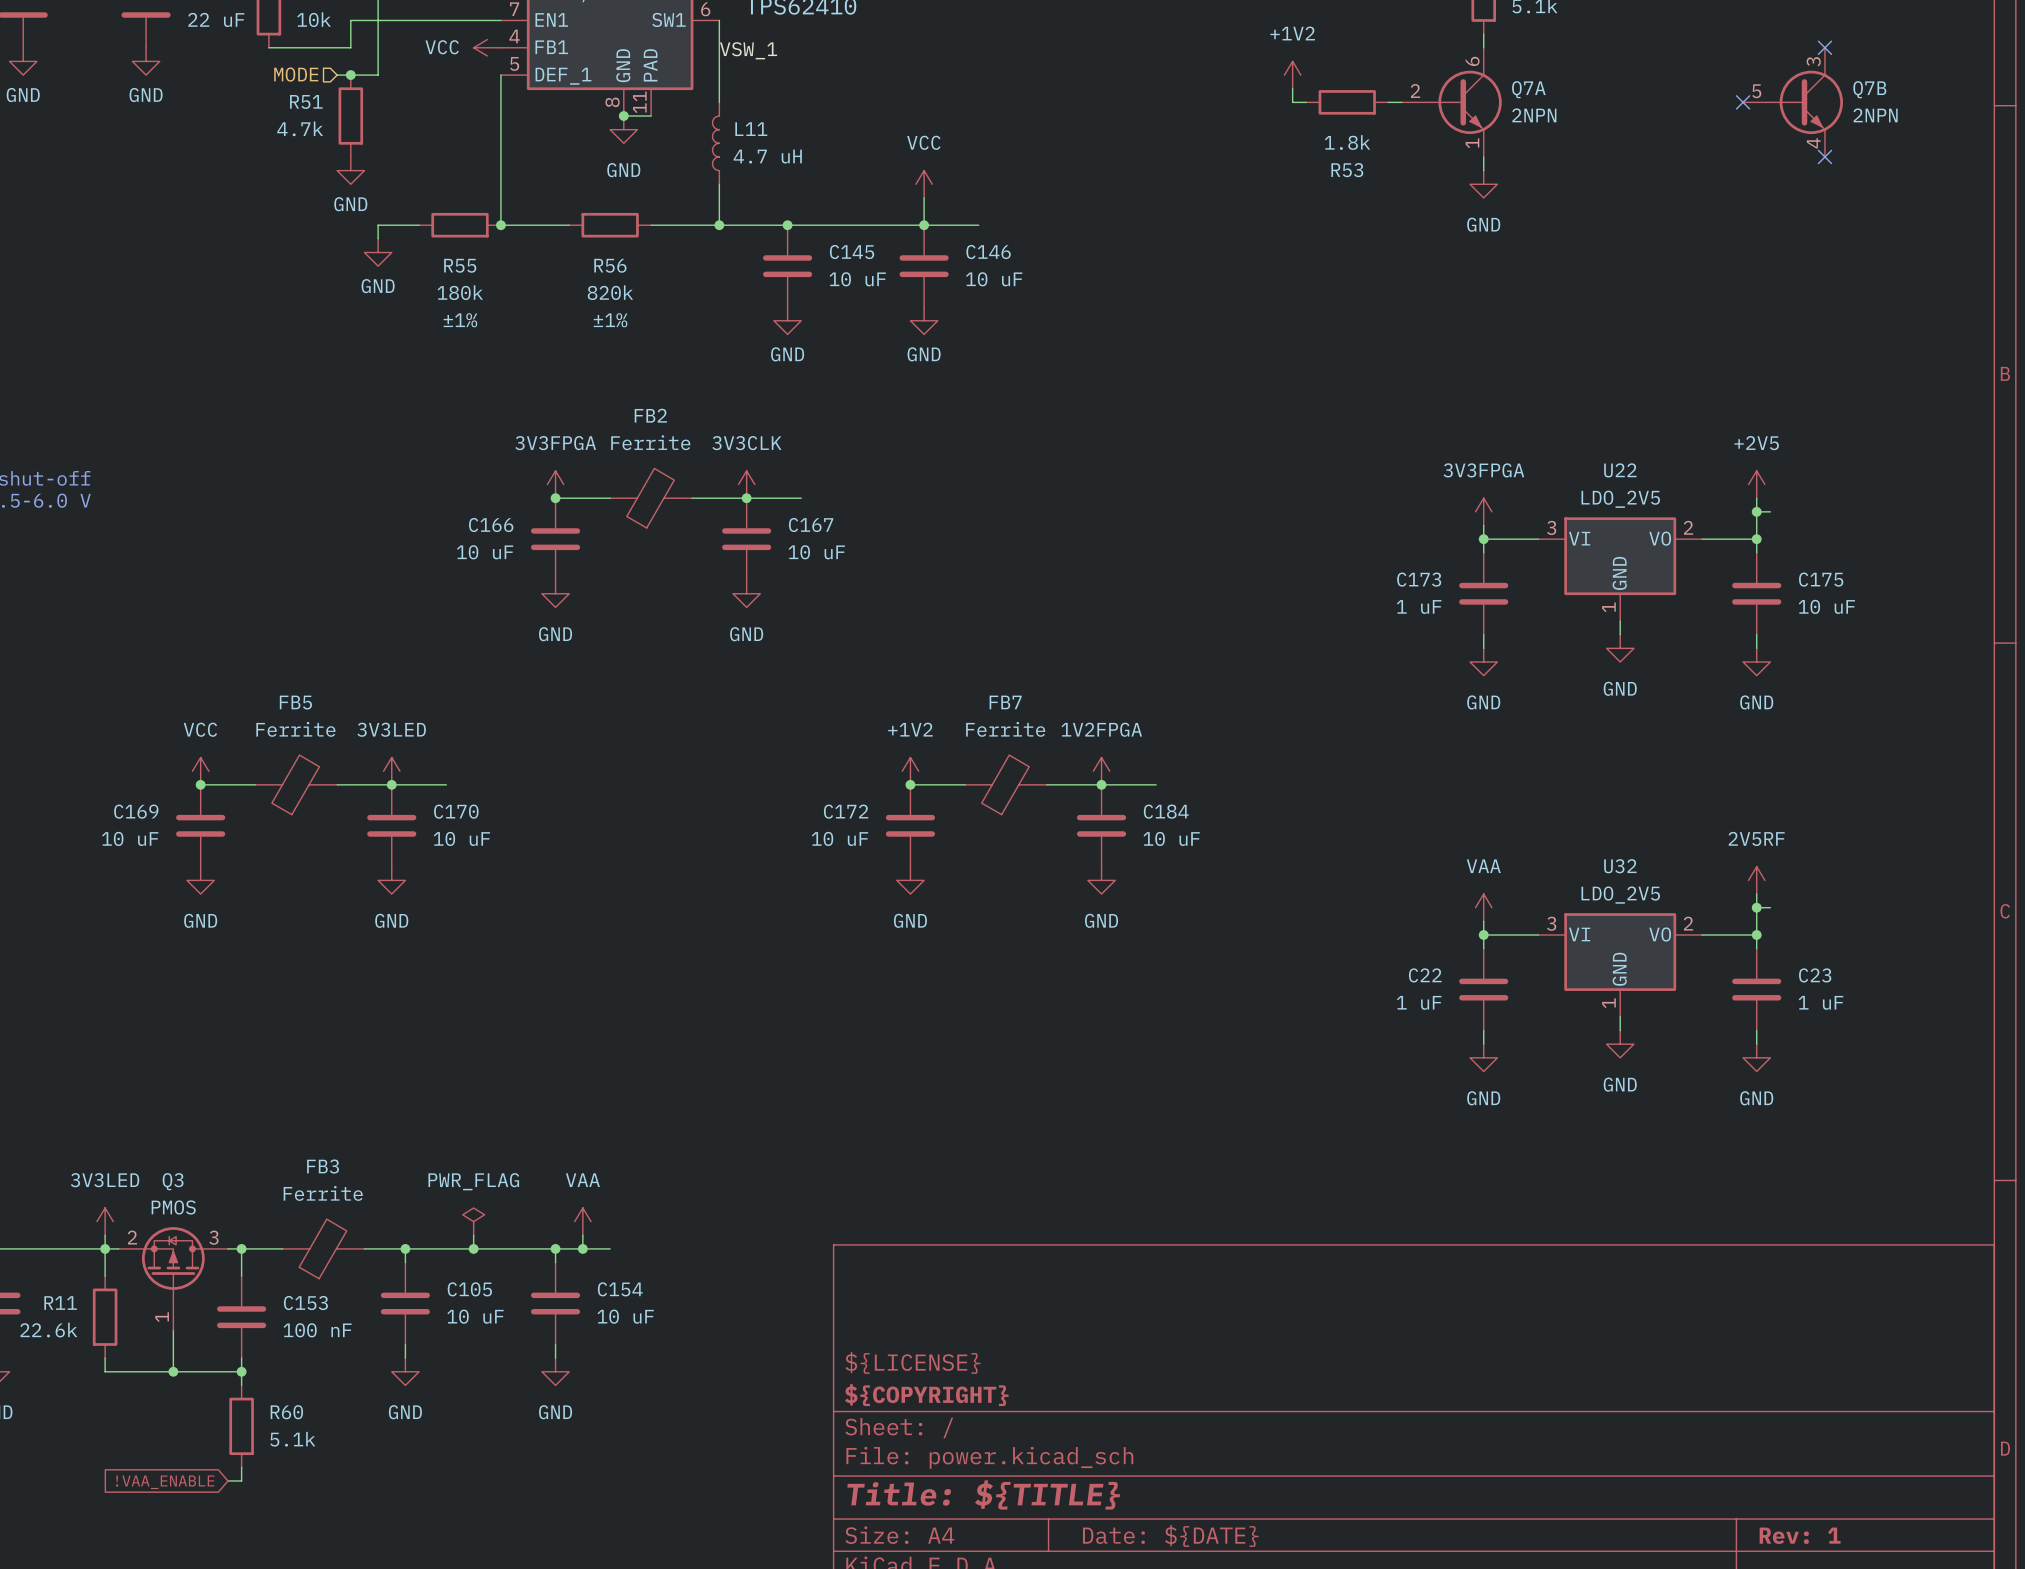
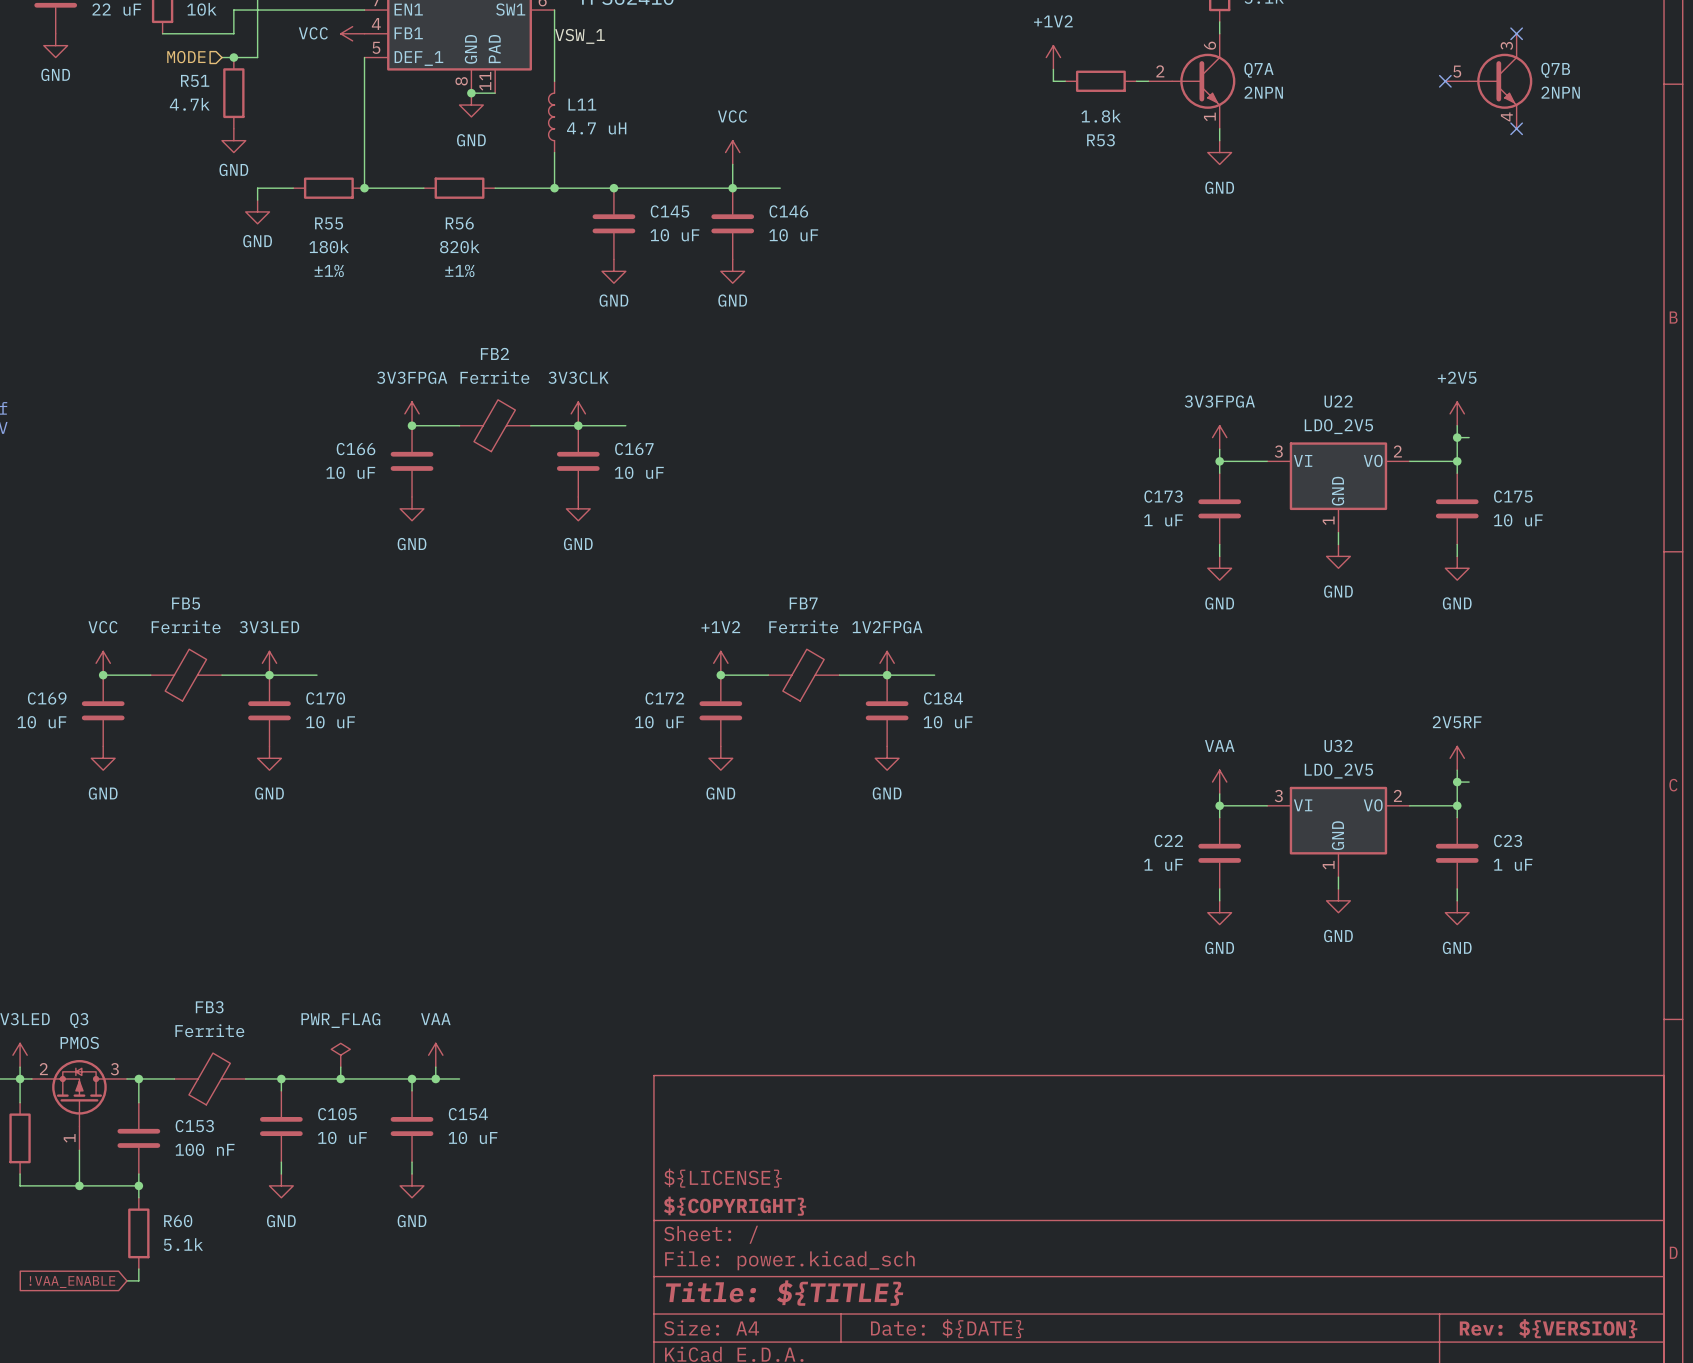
title block: Rev: 1 (1800, 1535) -> Rev: ${VERSION} (1548, 1328)

